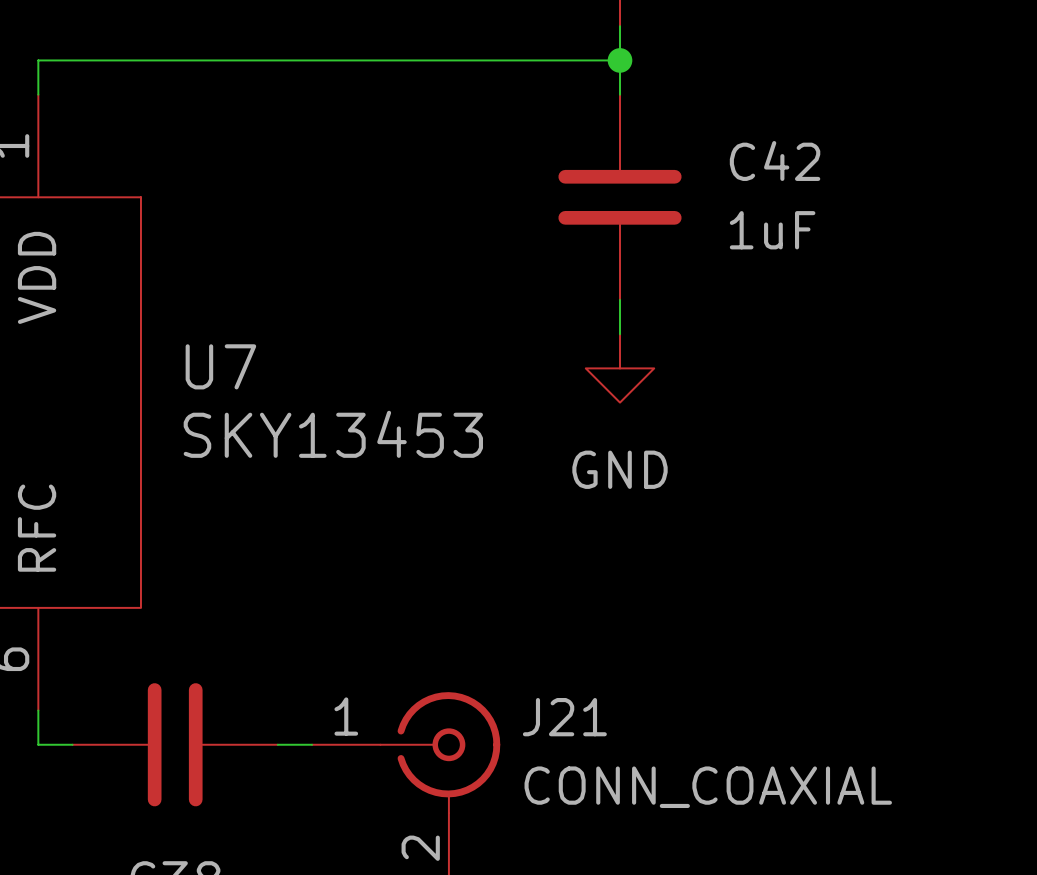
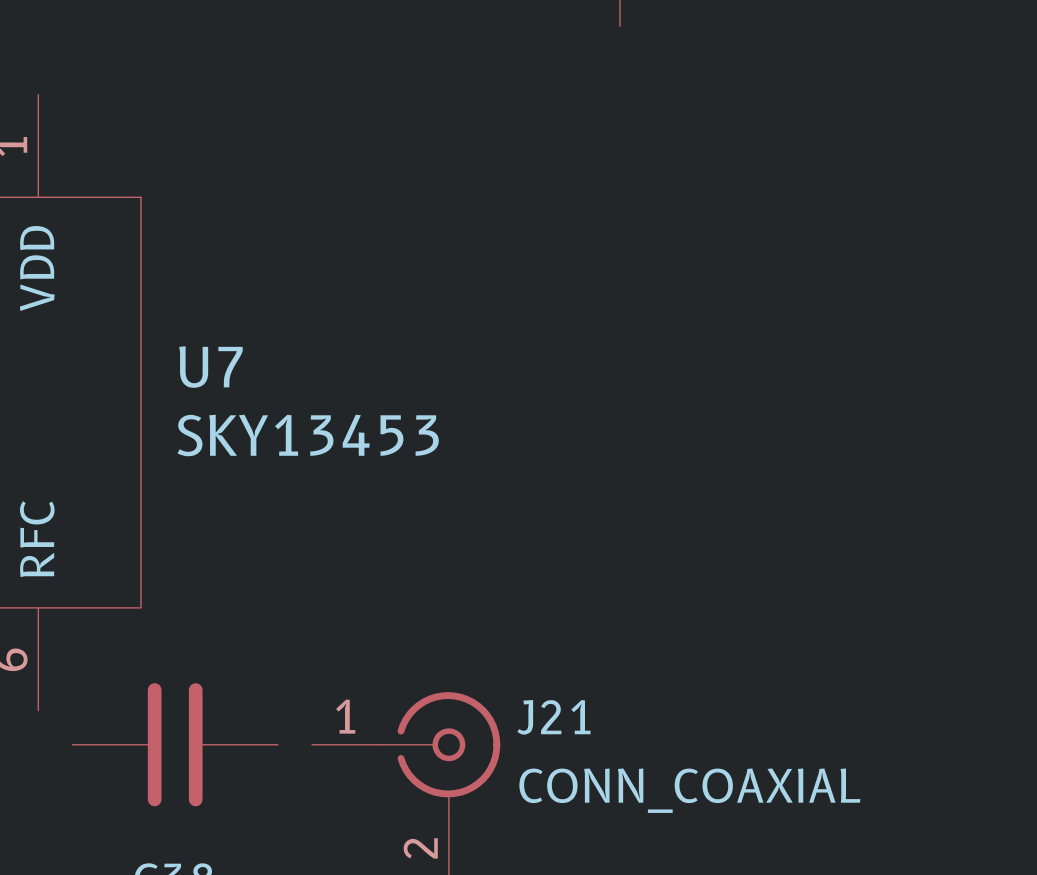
wire: (620, 26) (620, 94) -> none
wire: (620, 60) (38, 60) (38, 94) -> none
junction: (620, 60) -> none
C42: 1uF (620, 197) -> none
wire: (620, 299) (620, 334) -> none
power symbol: GND (620, 368) -> none
wire: (38, 710) (38, 744) (72, 744) -> none
wire: (277, 744) (312, 744) -> none

